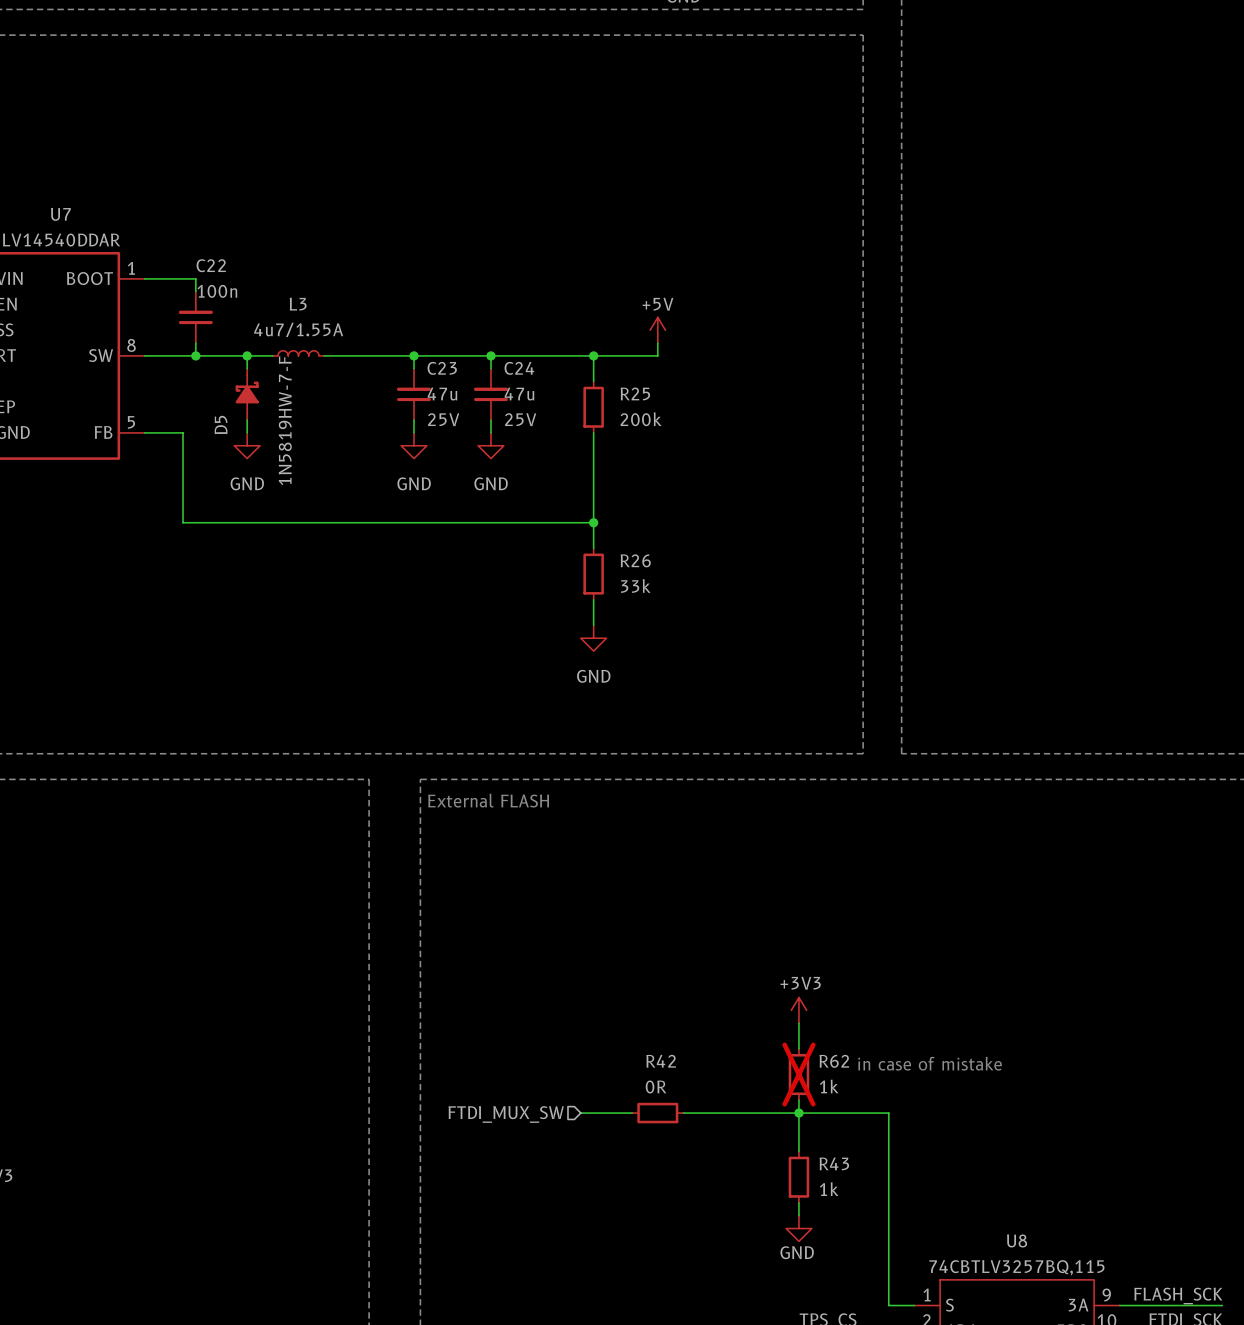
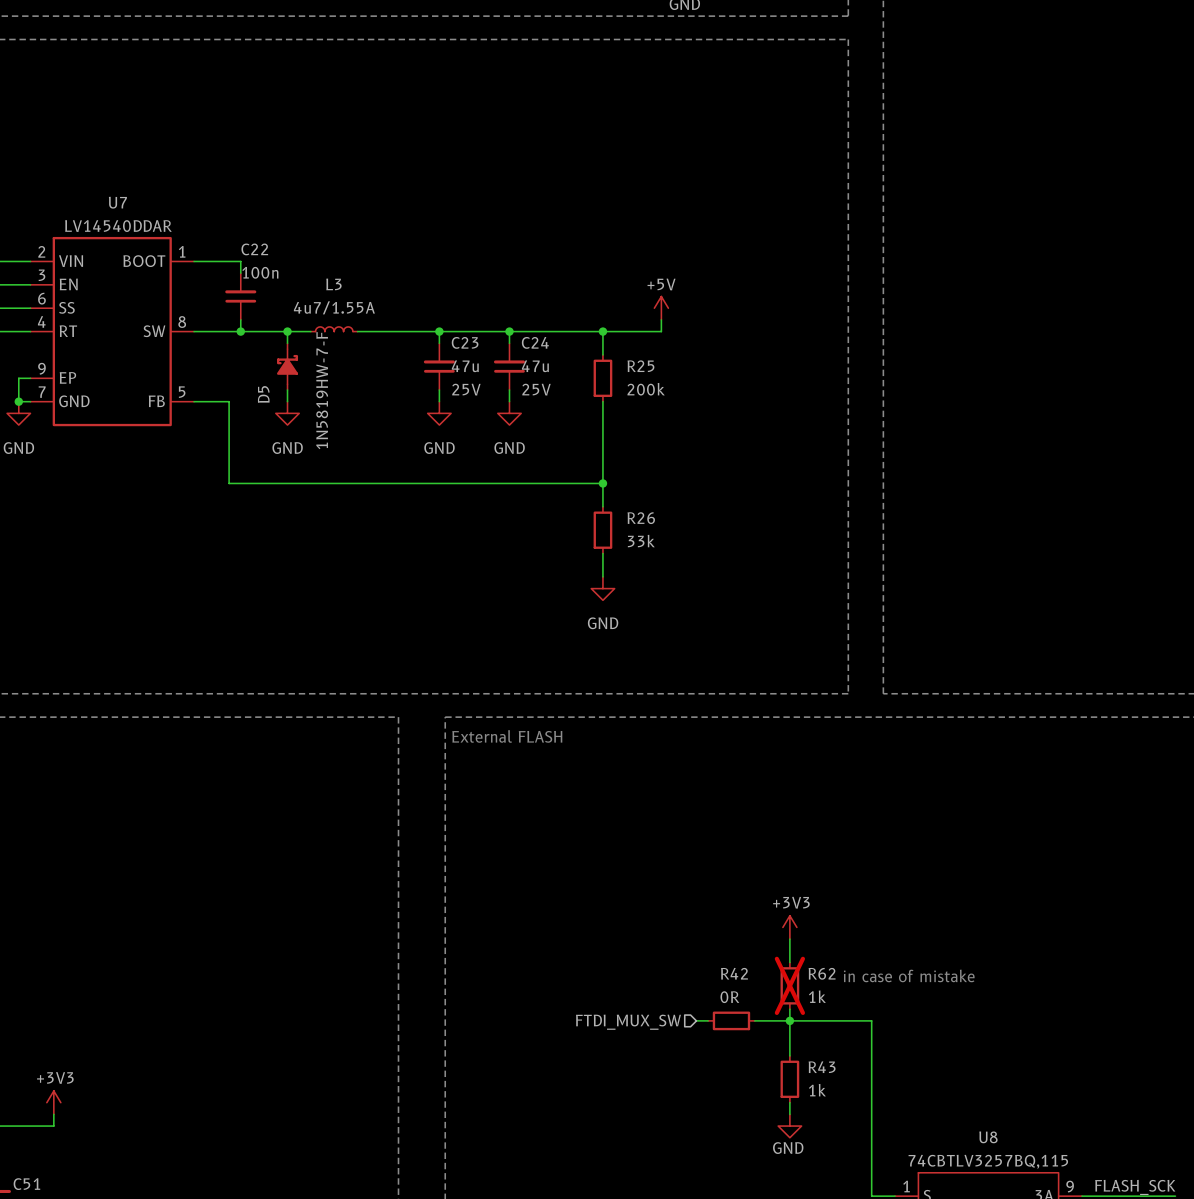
wire: (580, 1113) (632, 1113) -> none
R42 position: (657, 1113) -> (731, 1020)
wire: (683, 1113) (696, 1113) -> none
wire: (709, 1113) (760, 1113) -> none
hierarchical label position: FTDI_MUX_SW (506, 1114) -> FTDI_MUX_SW (628, 1022)

